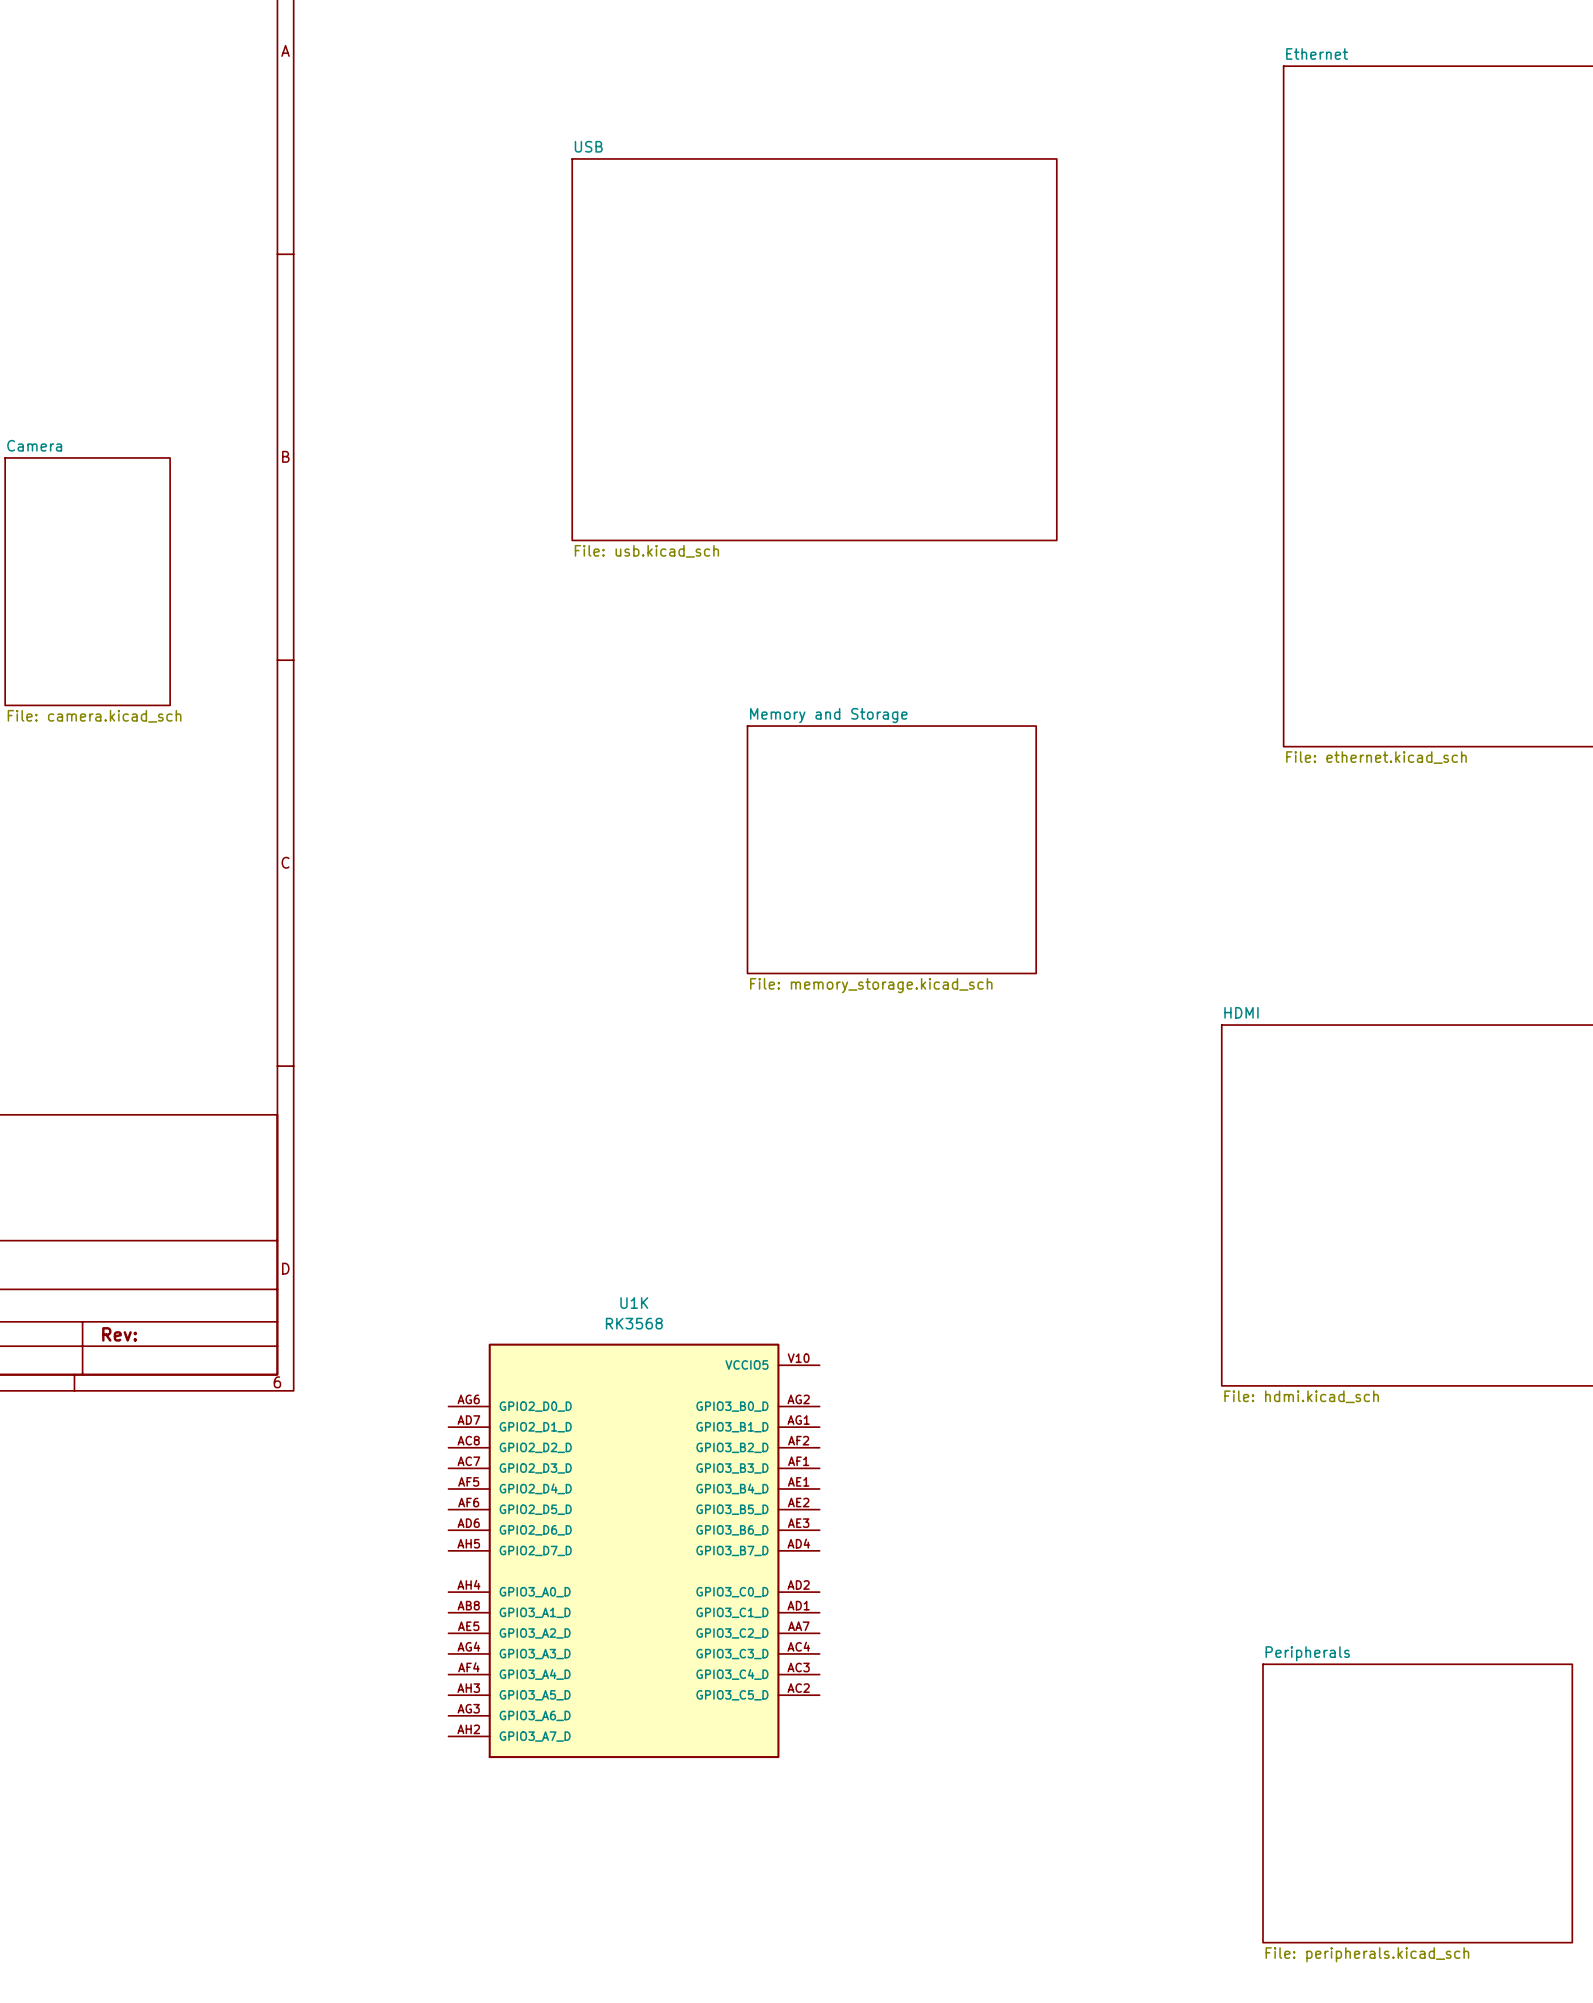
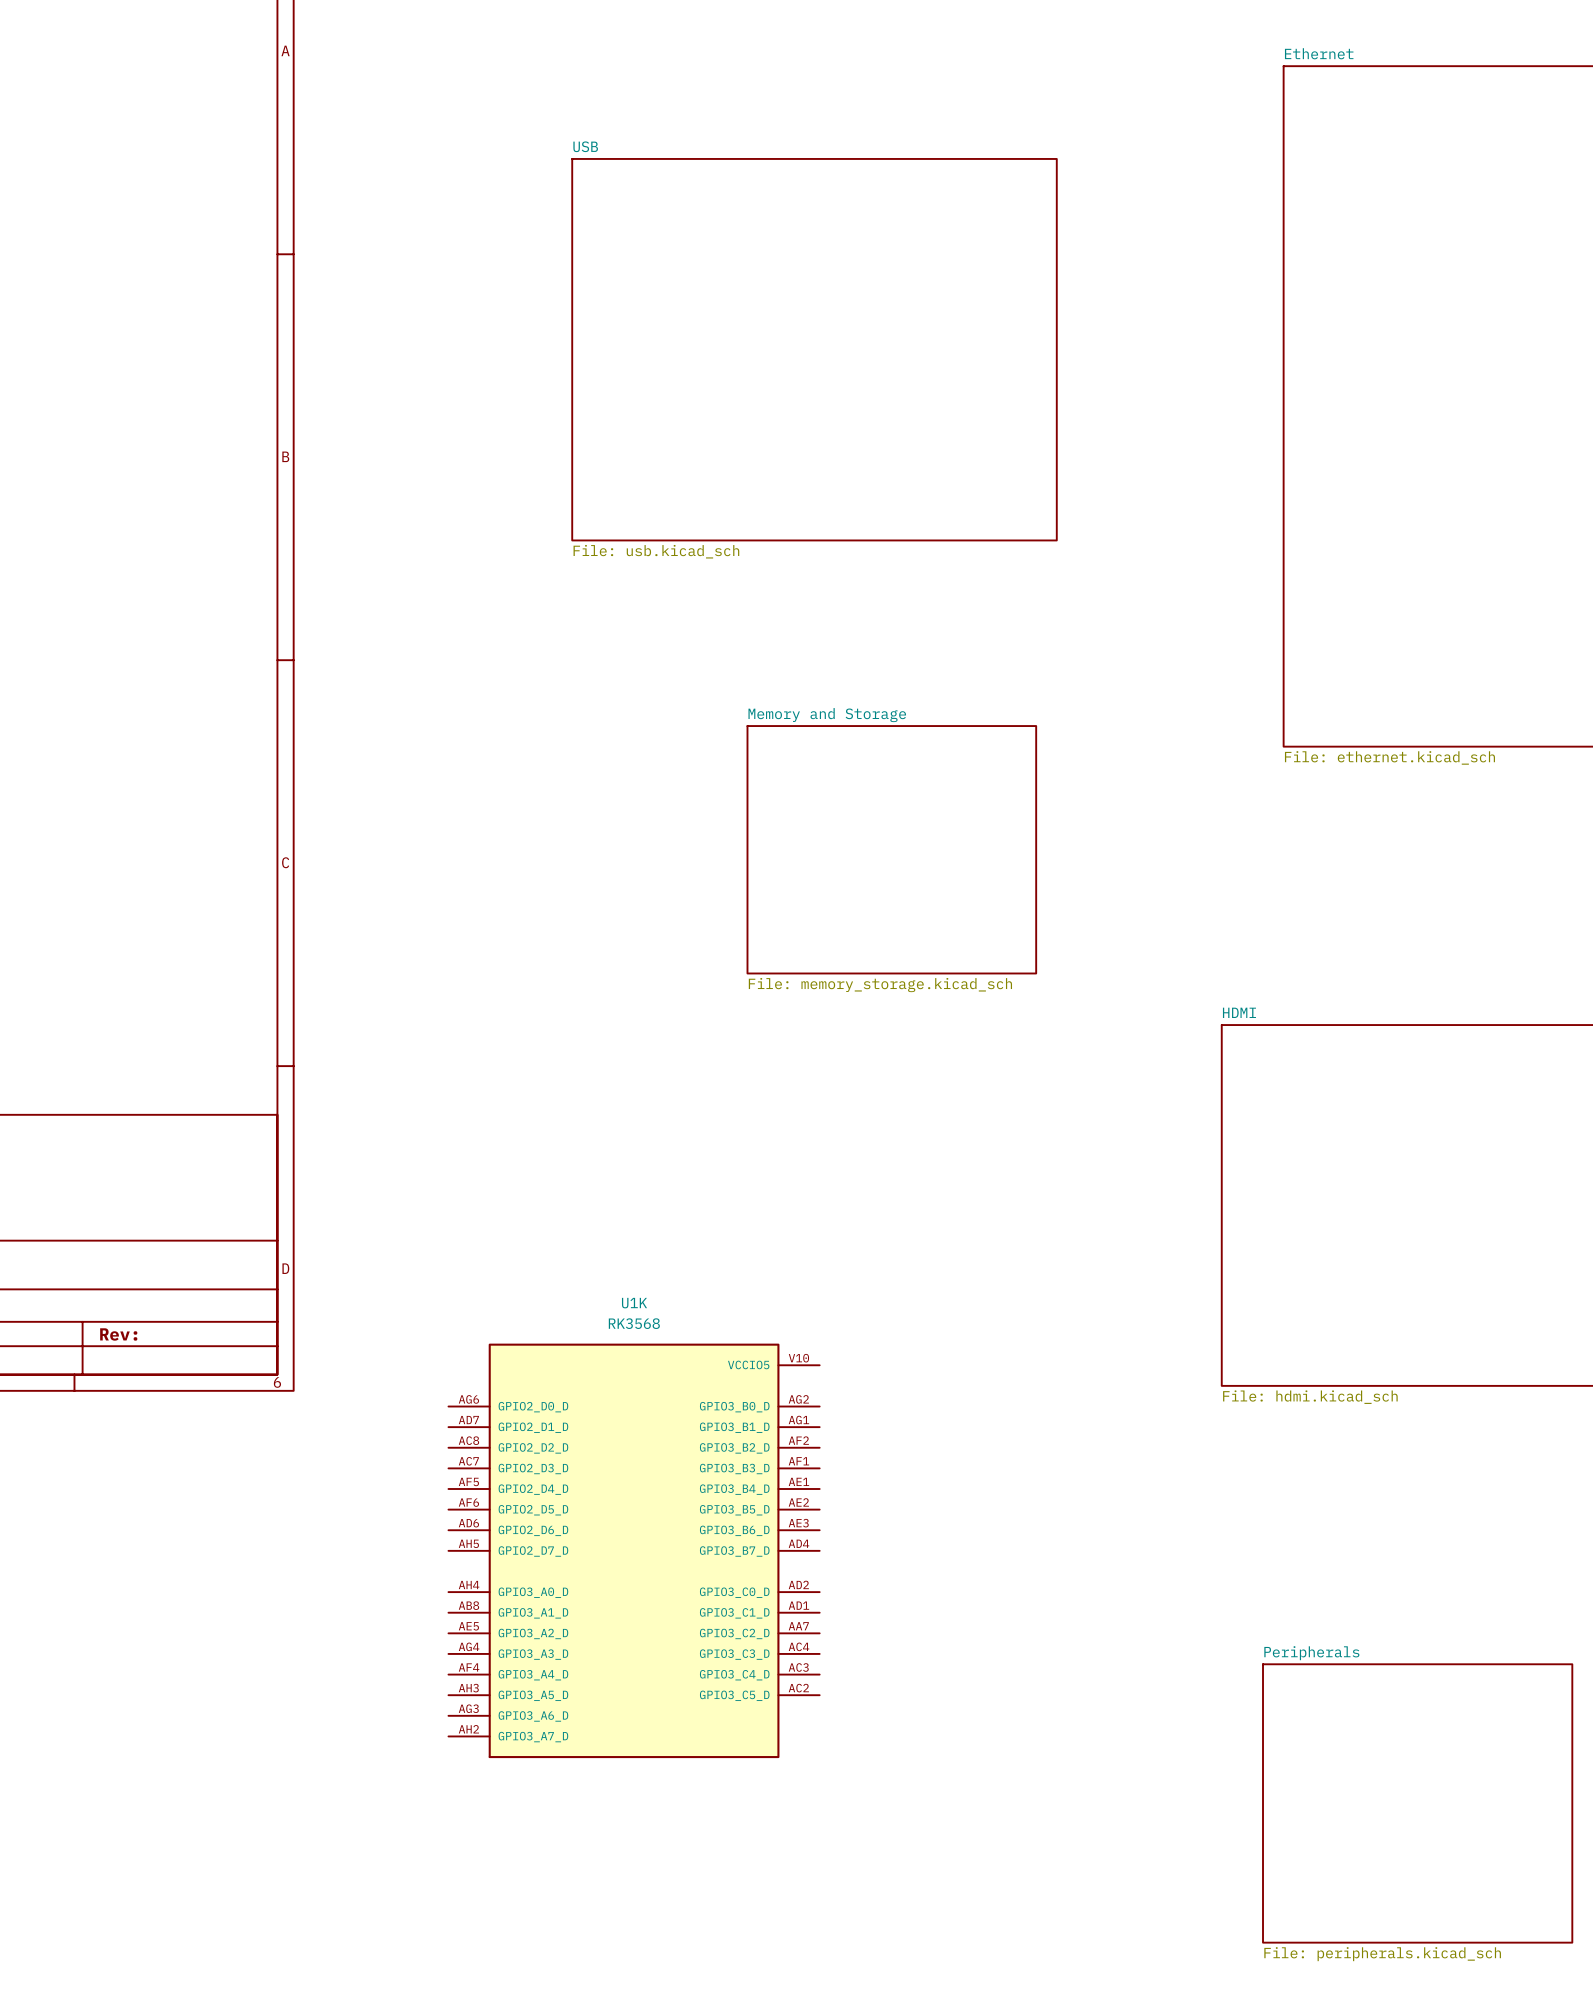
sheet Camera: File: camera.kicad_sch (87, 581) -> none

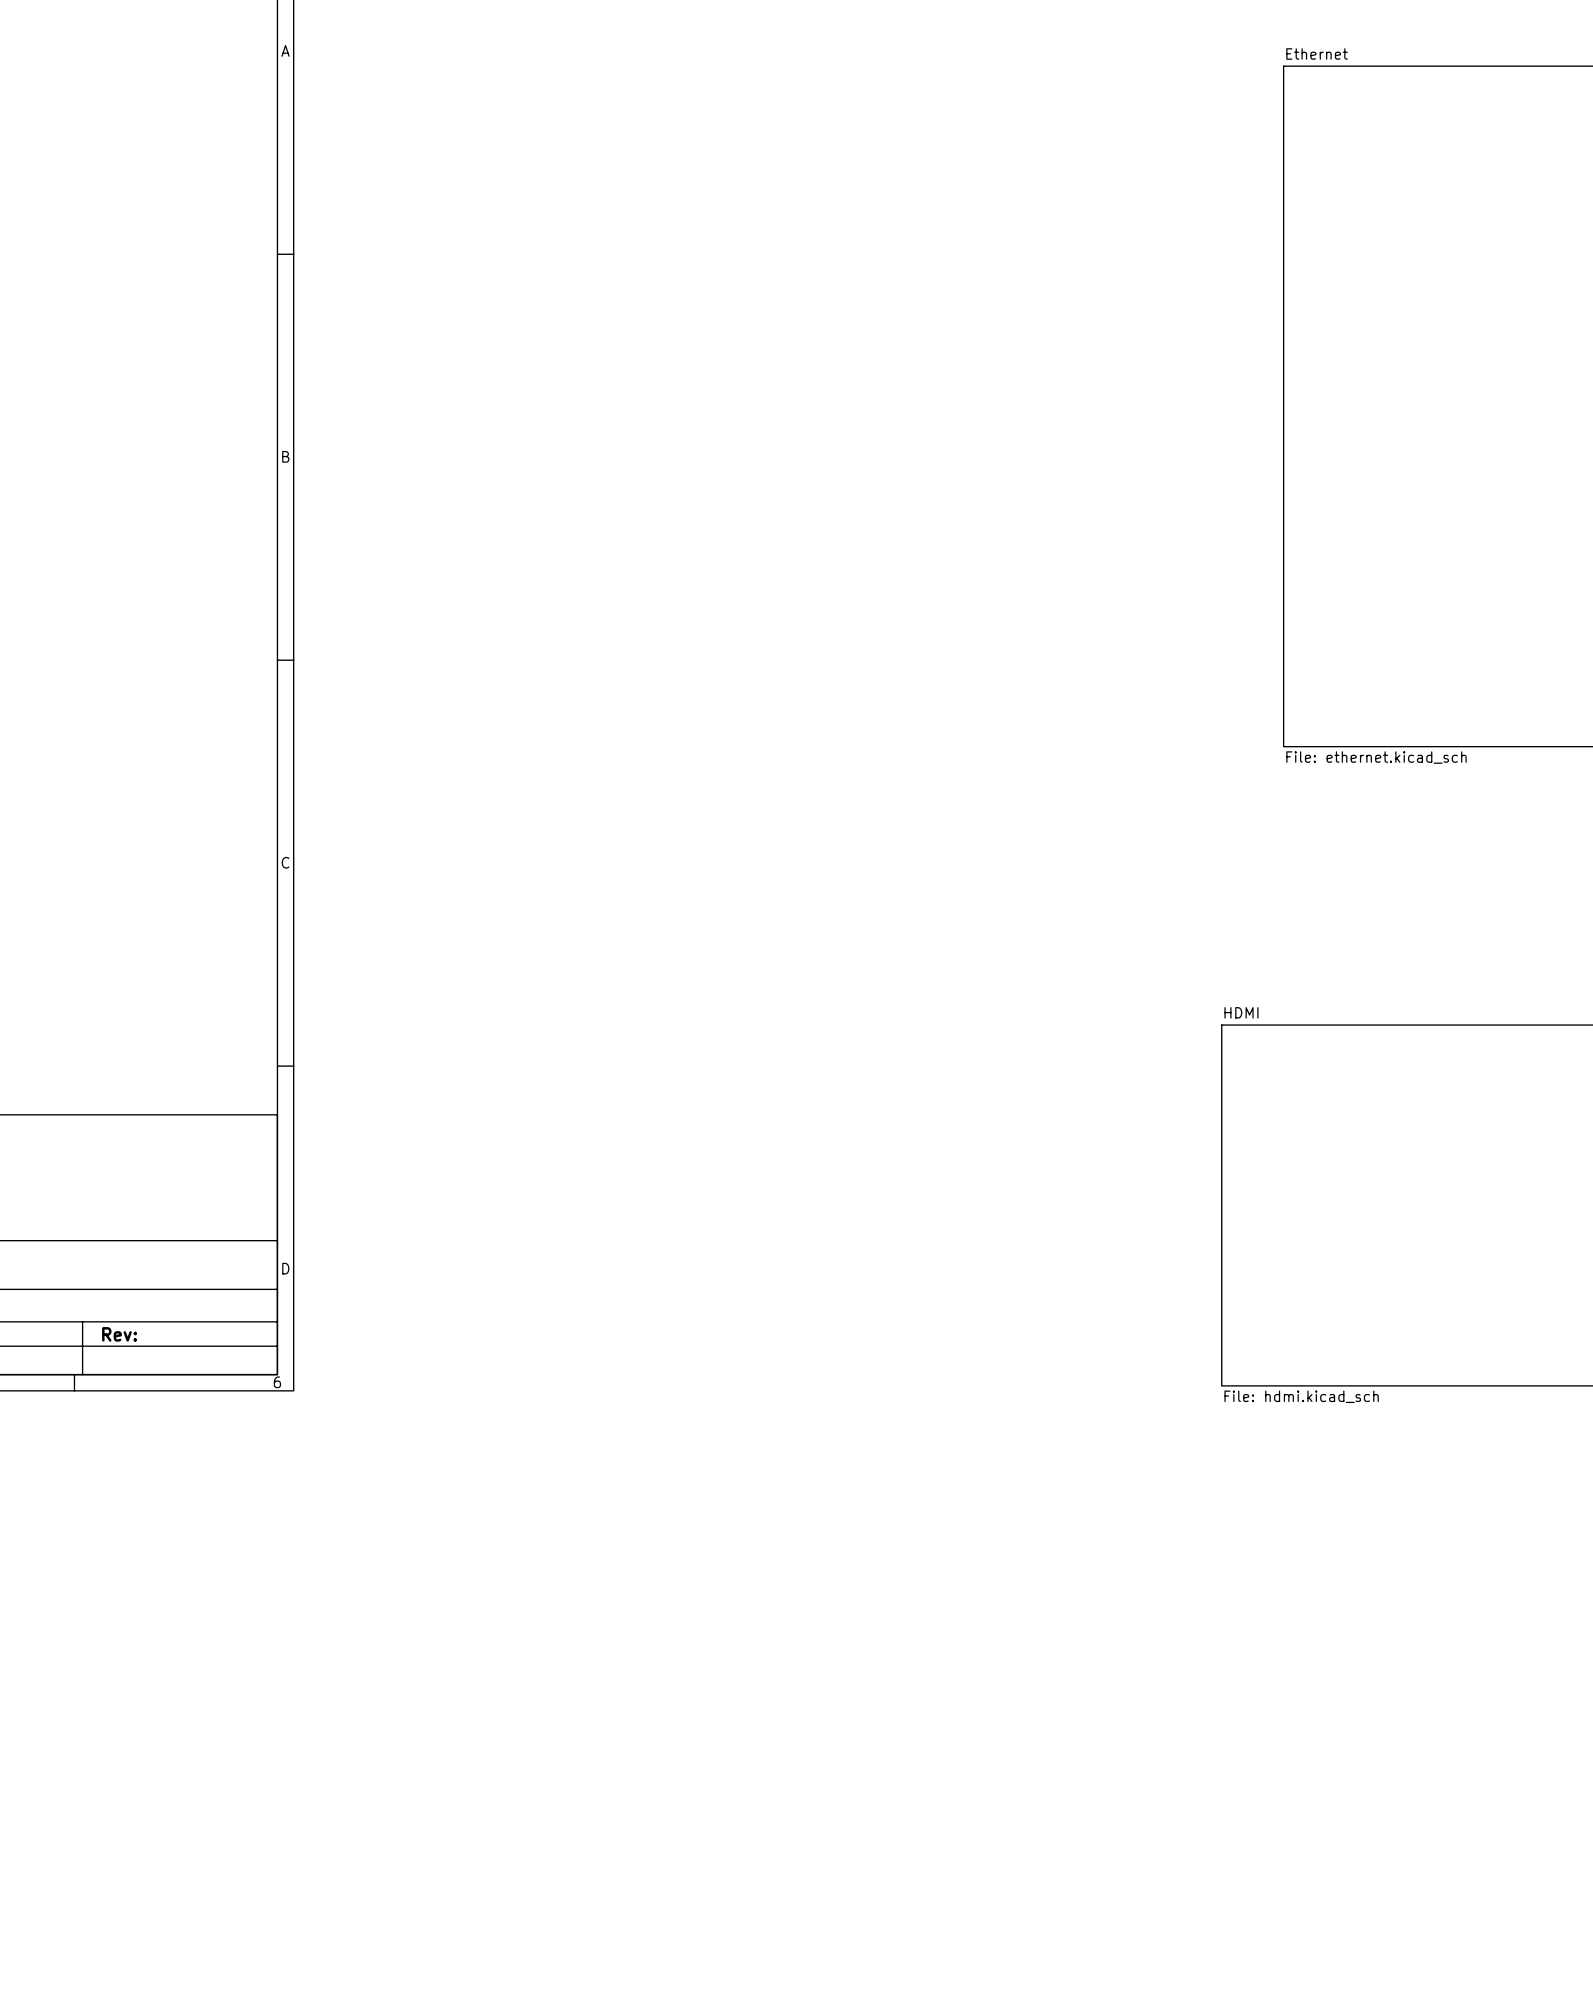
sheet USB: File: usb.kicad_sch (814, 349) -> none
sheet Memory and Storage: File: memory_storage.kicad_sch (891, 849) -> none
U1K: RK3568 (634, 1550) -> none
sheet Peripherals: File: peripherals.kicad_sch (1417, 1803) -> none

